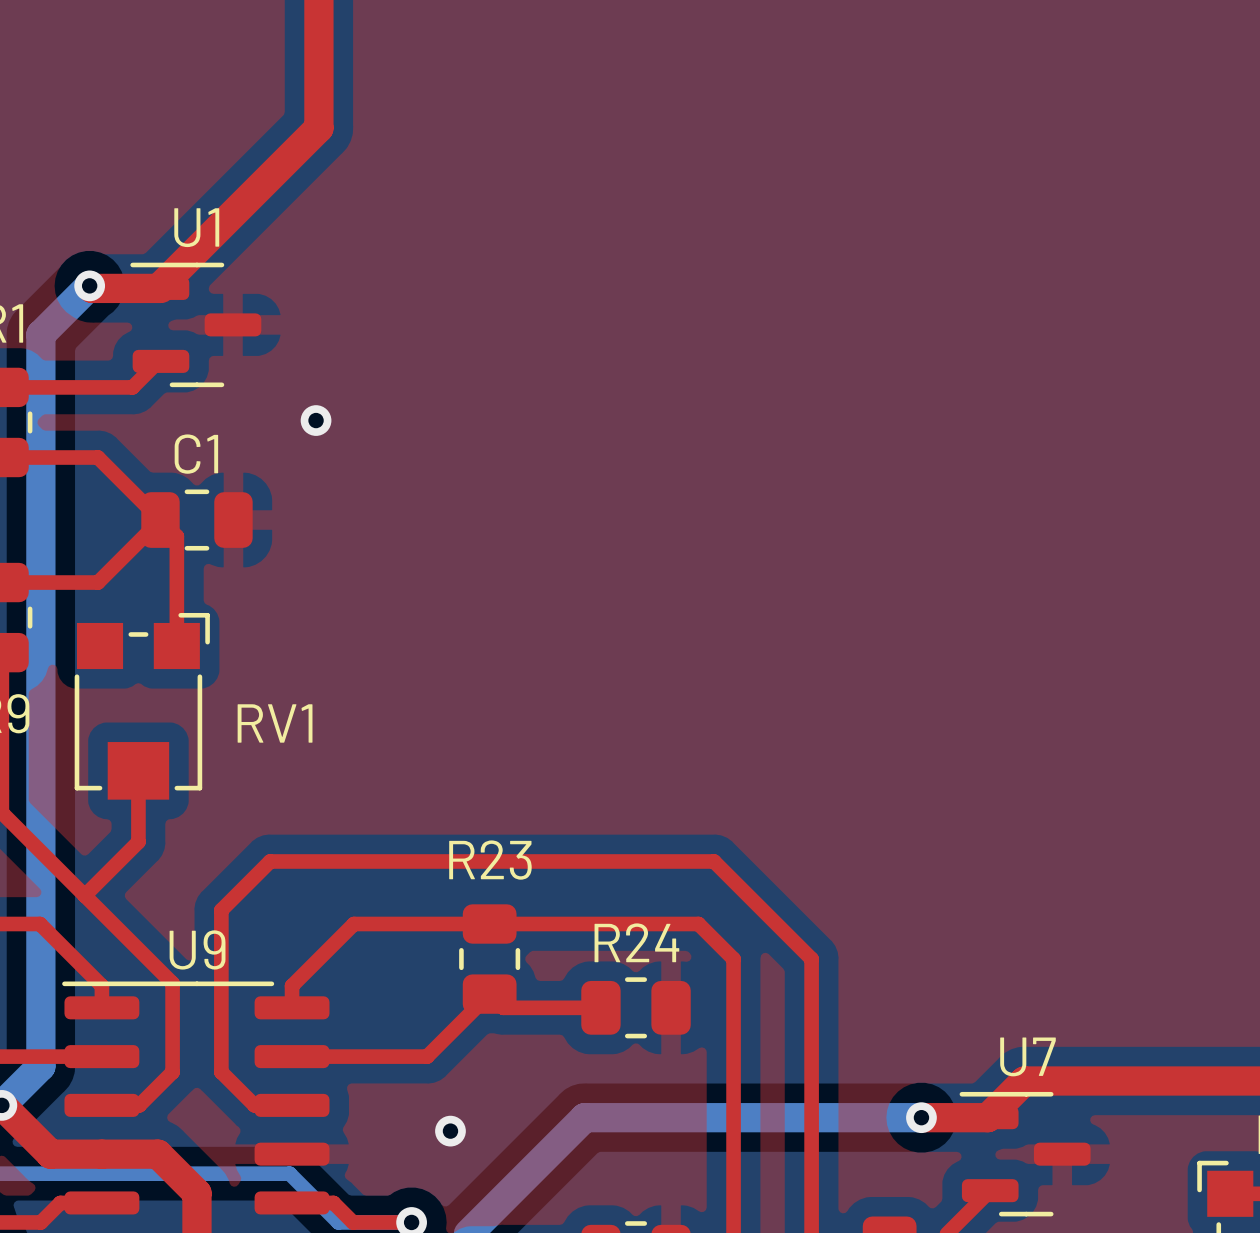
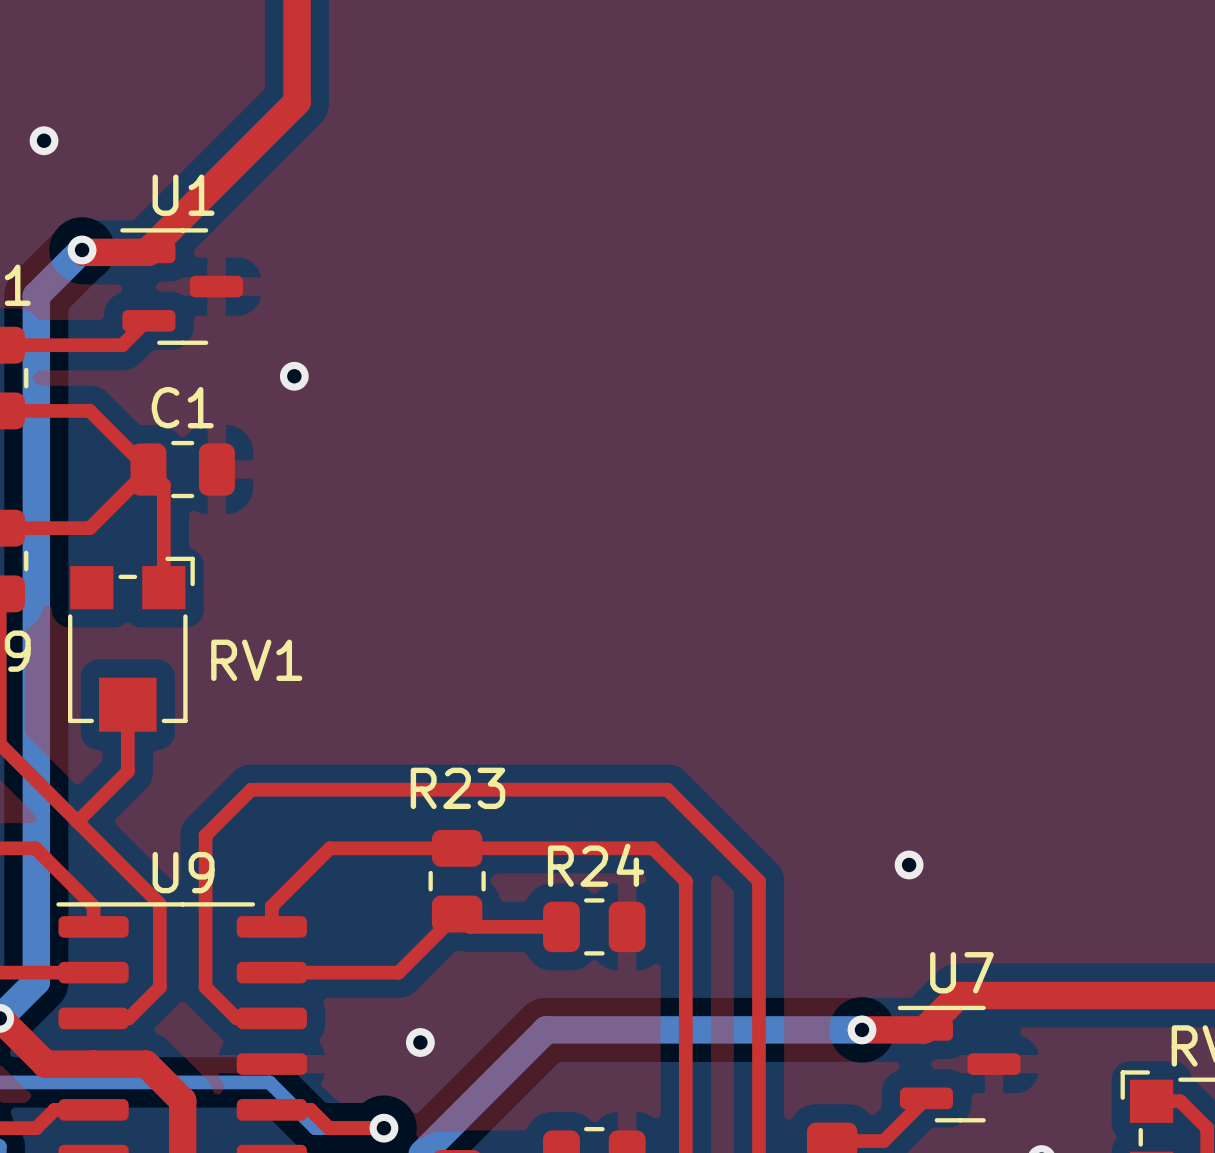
via: none -> (44, 140)
via: none -> (909, 864)

